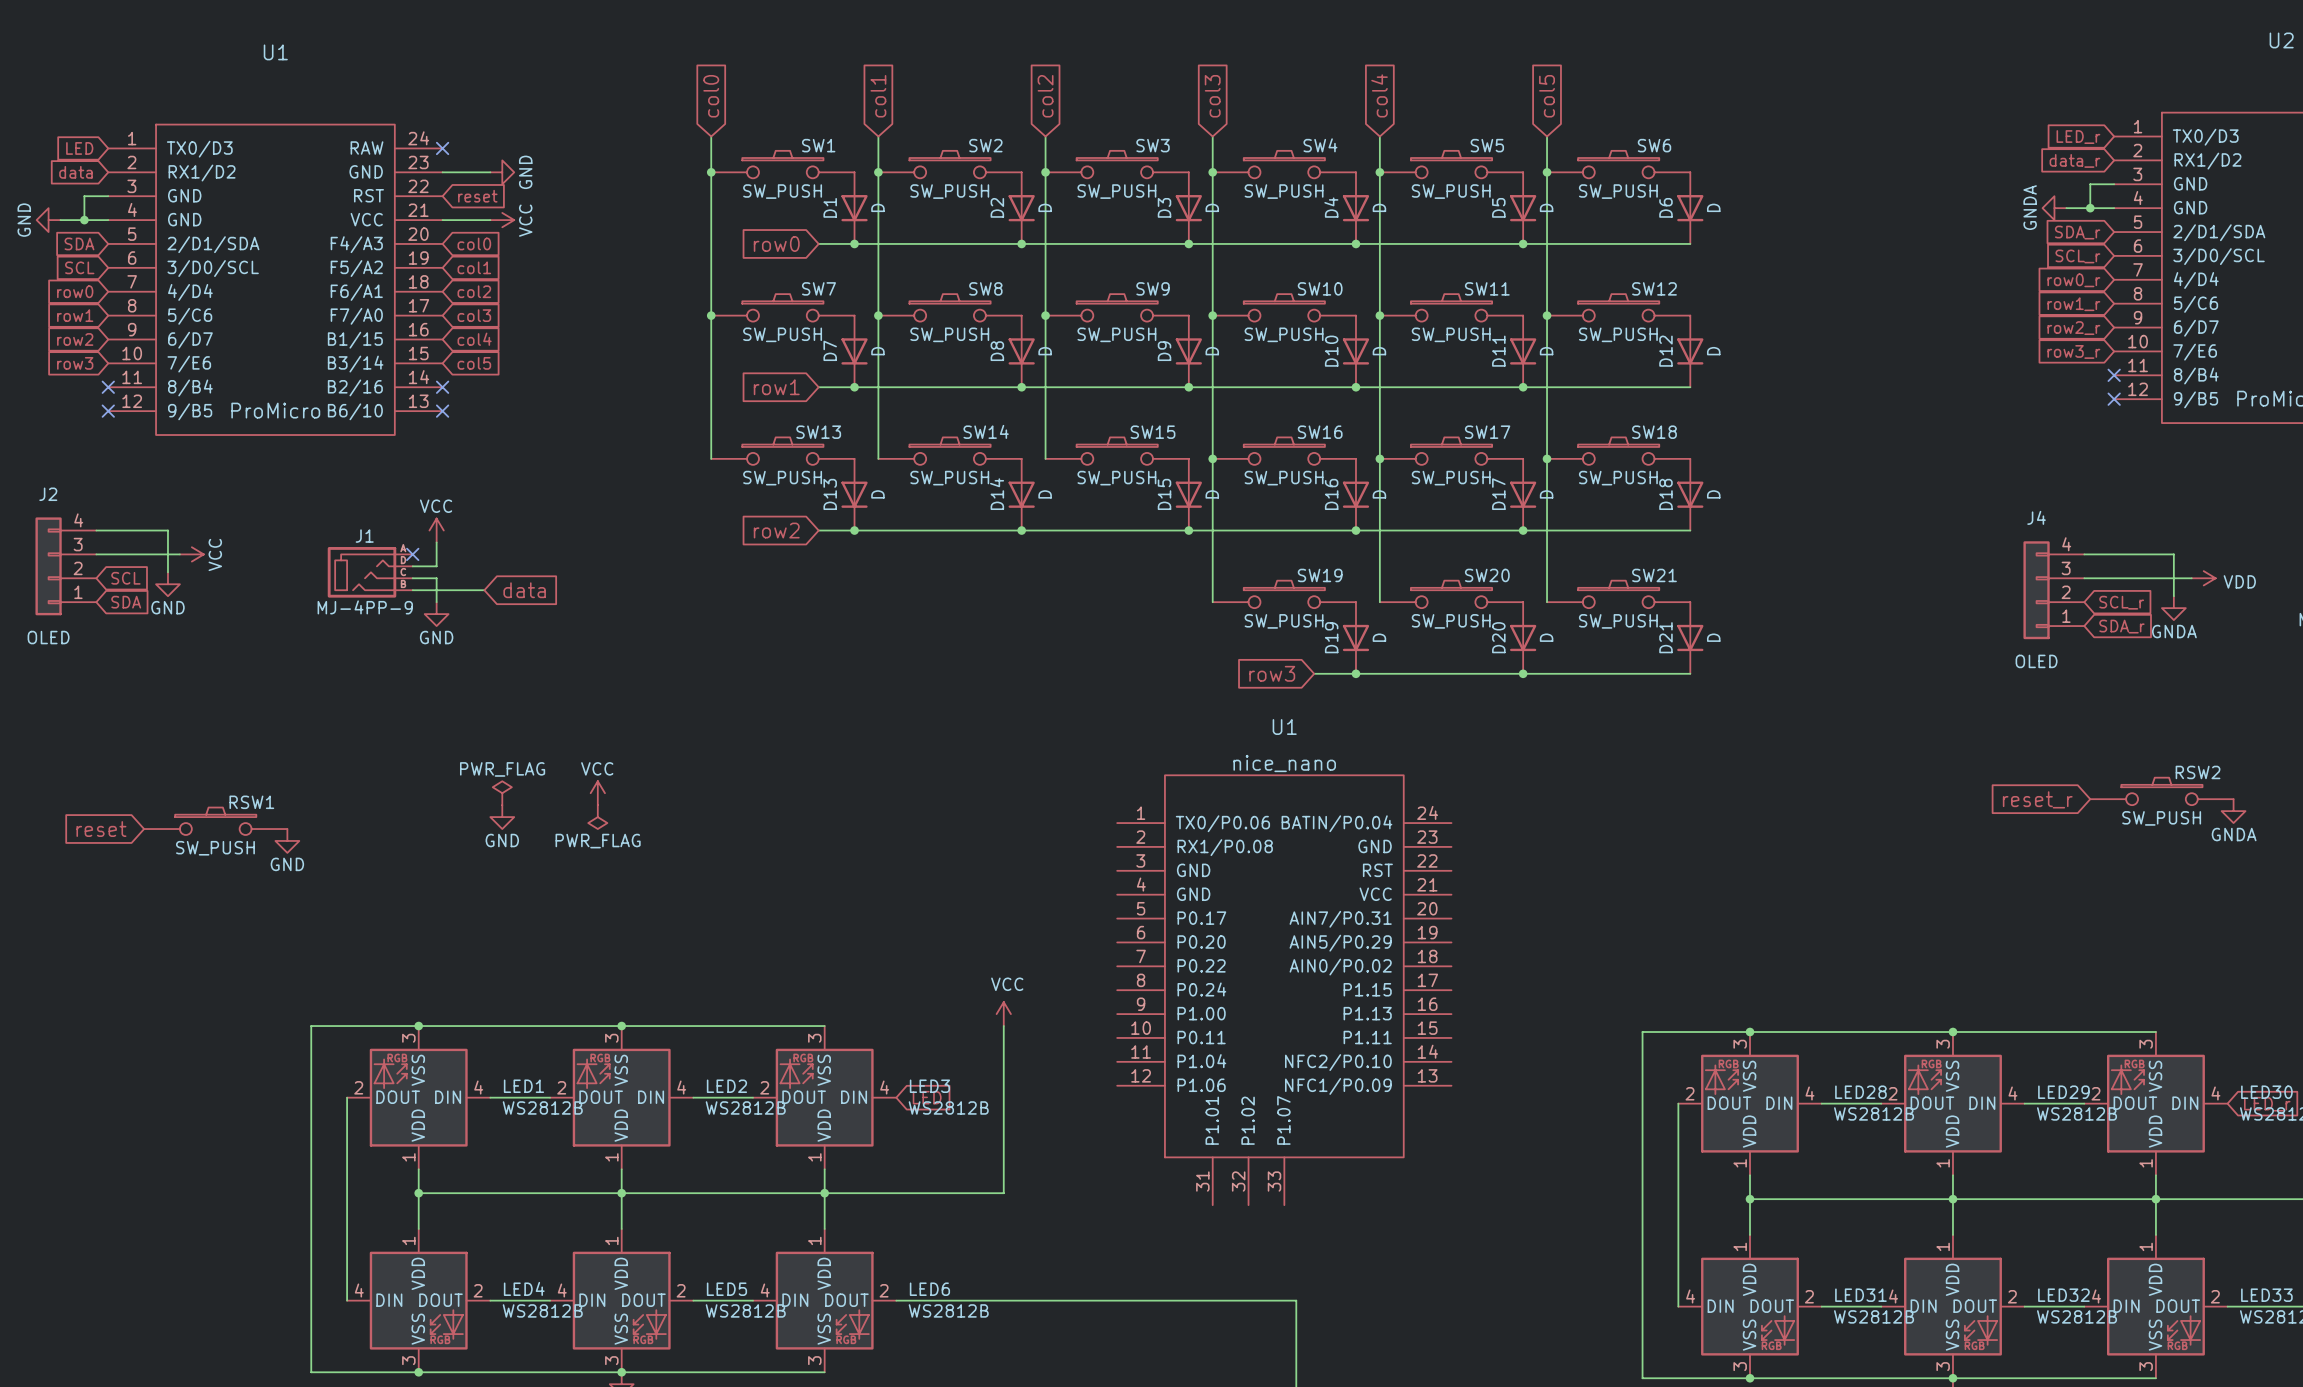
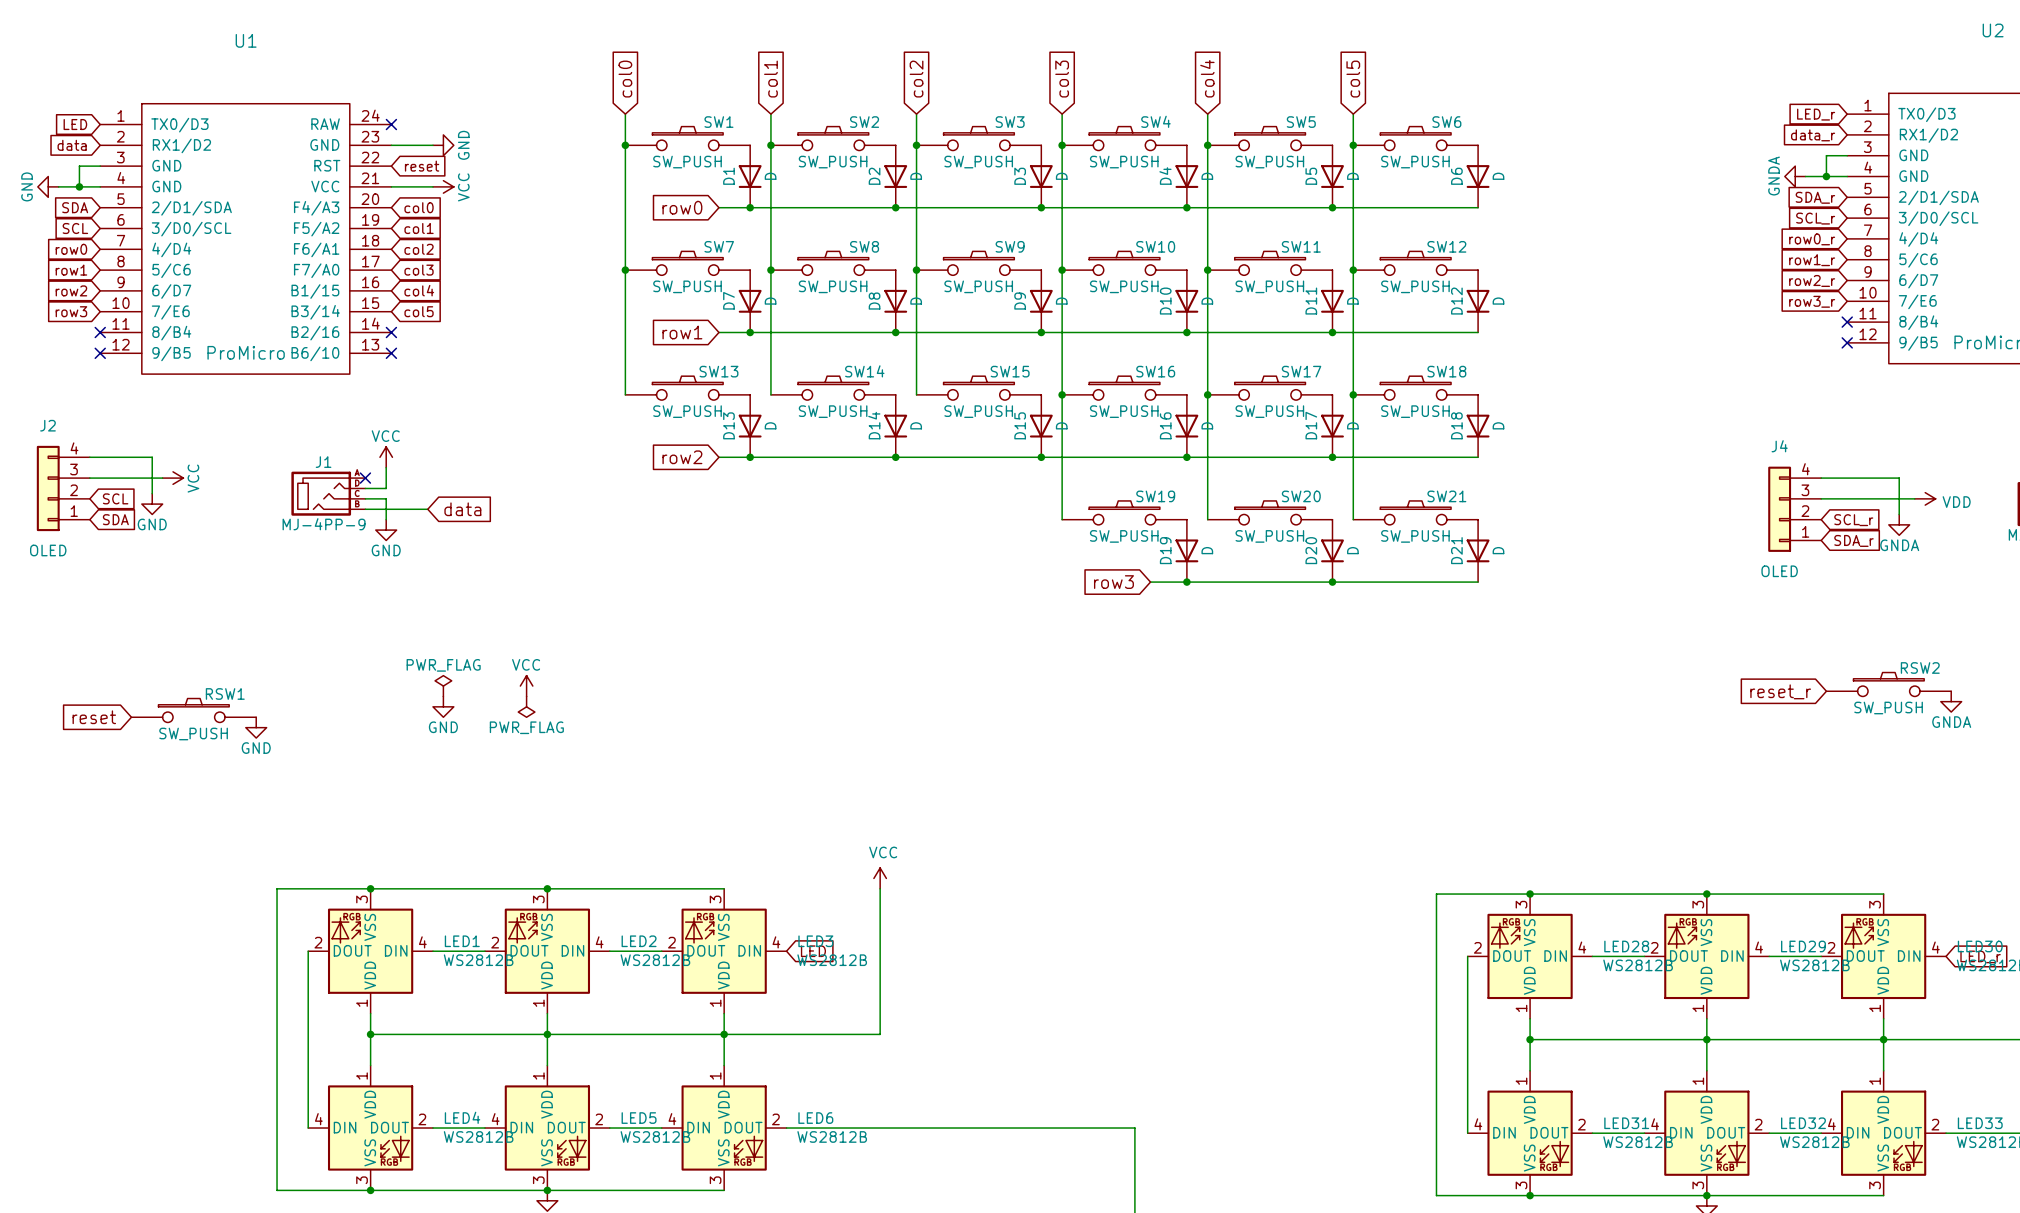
U1: nice_nano (1284, 990) -> none

